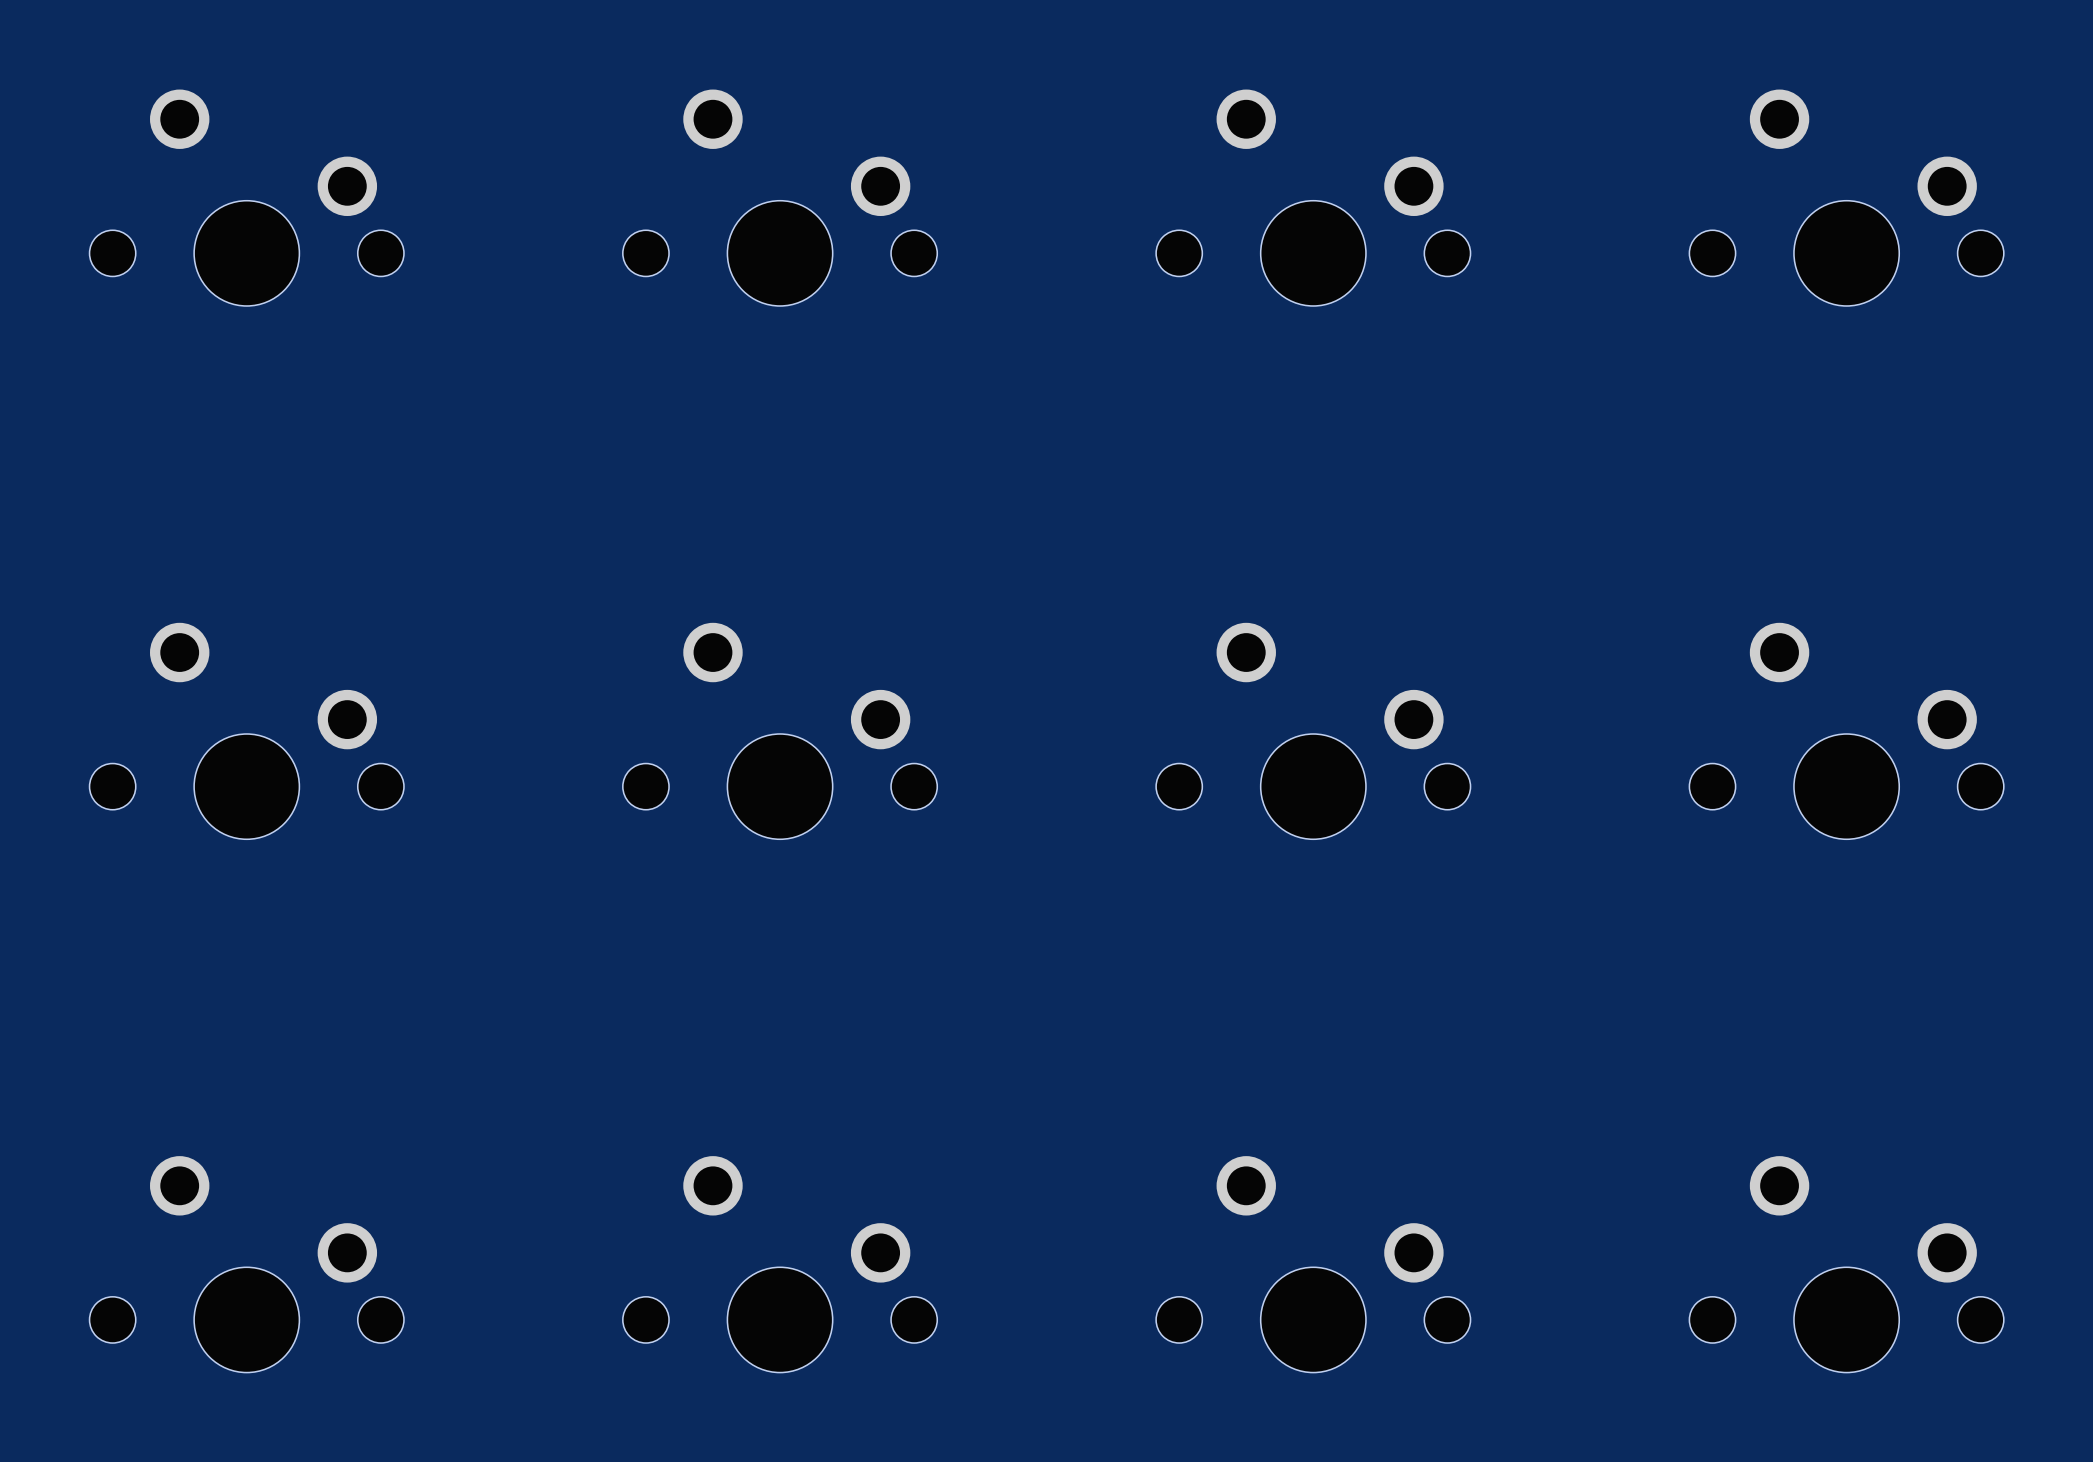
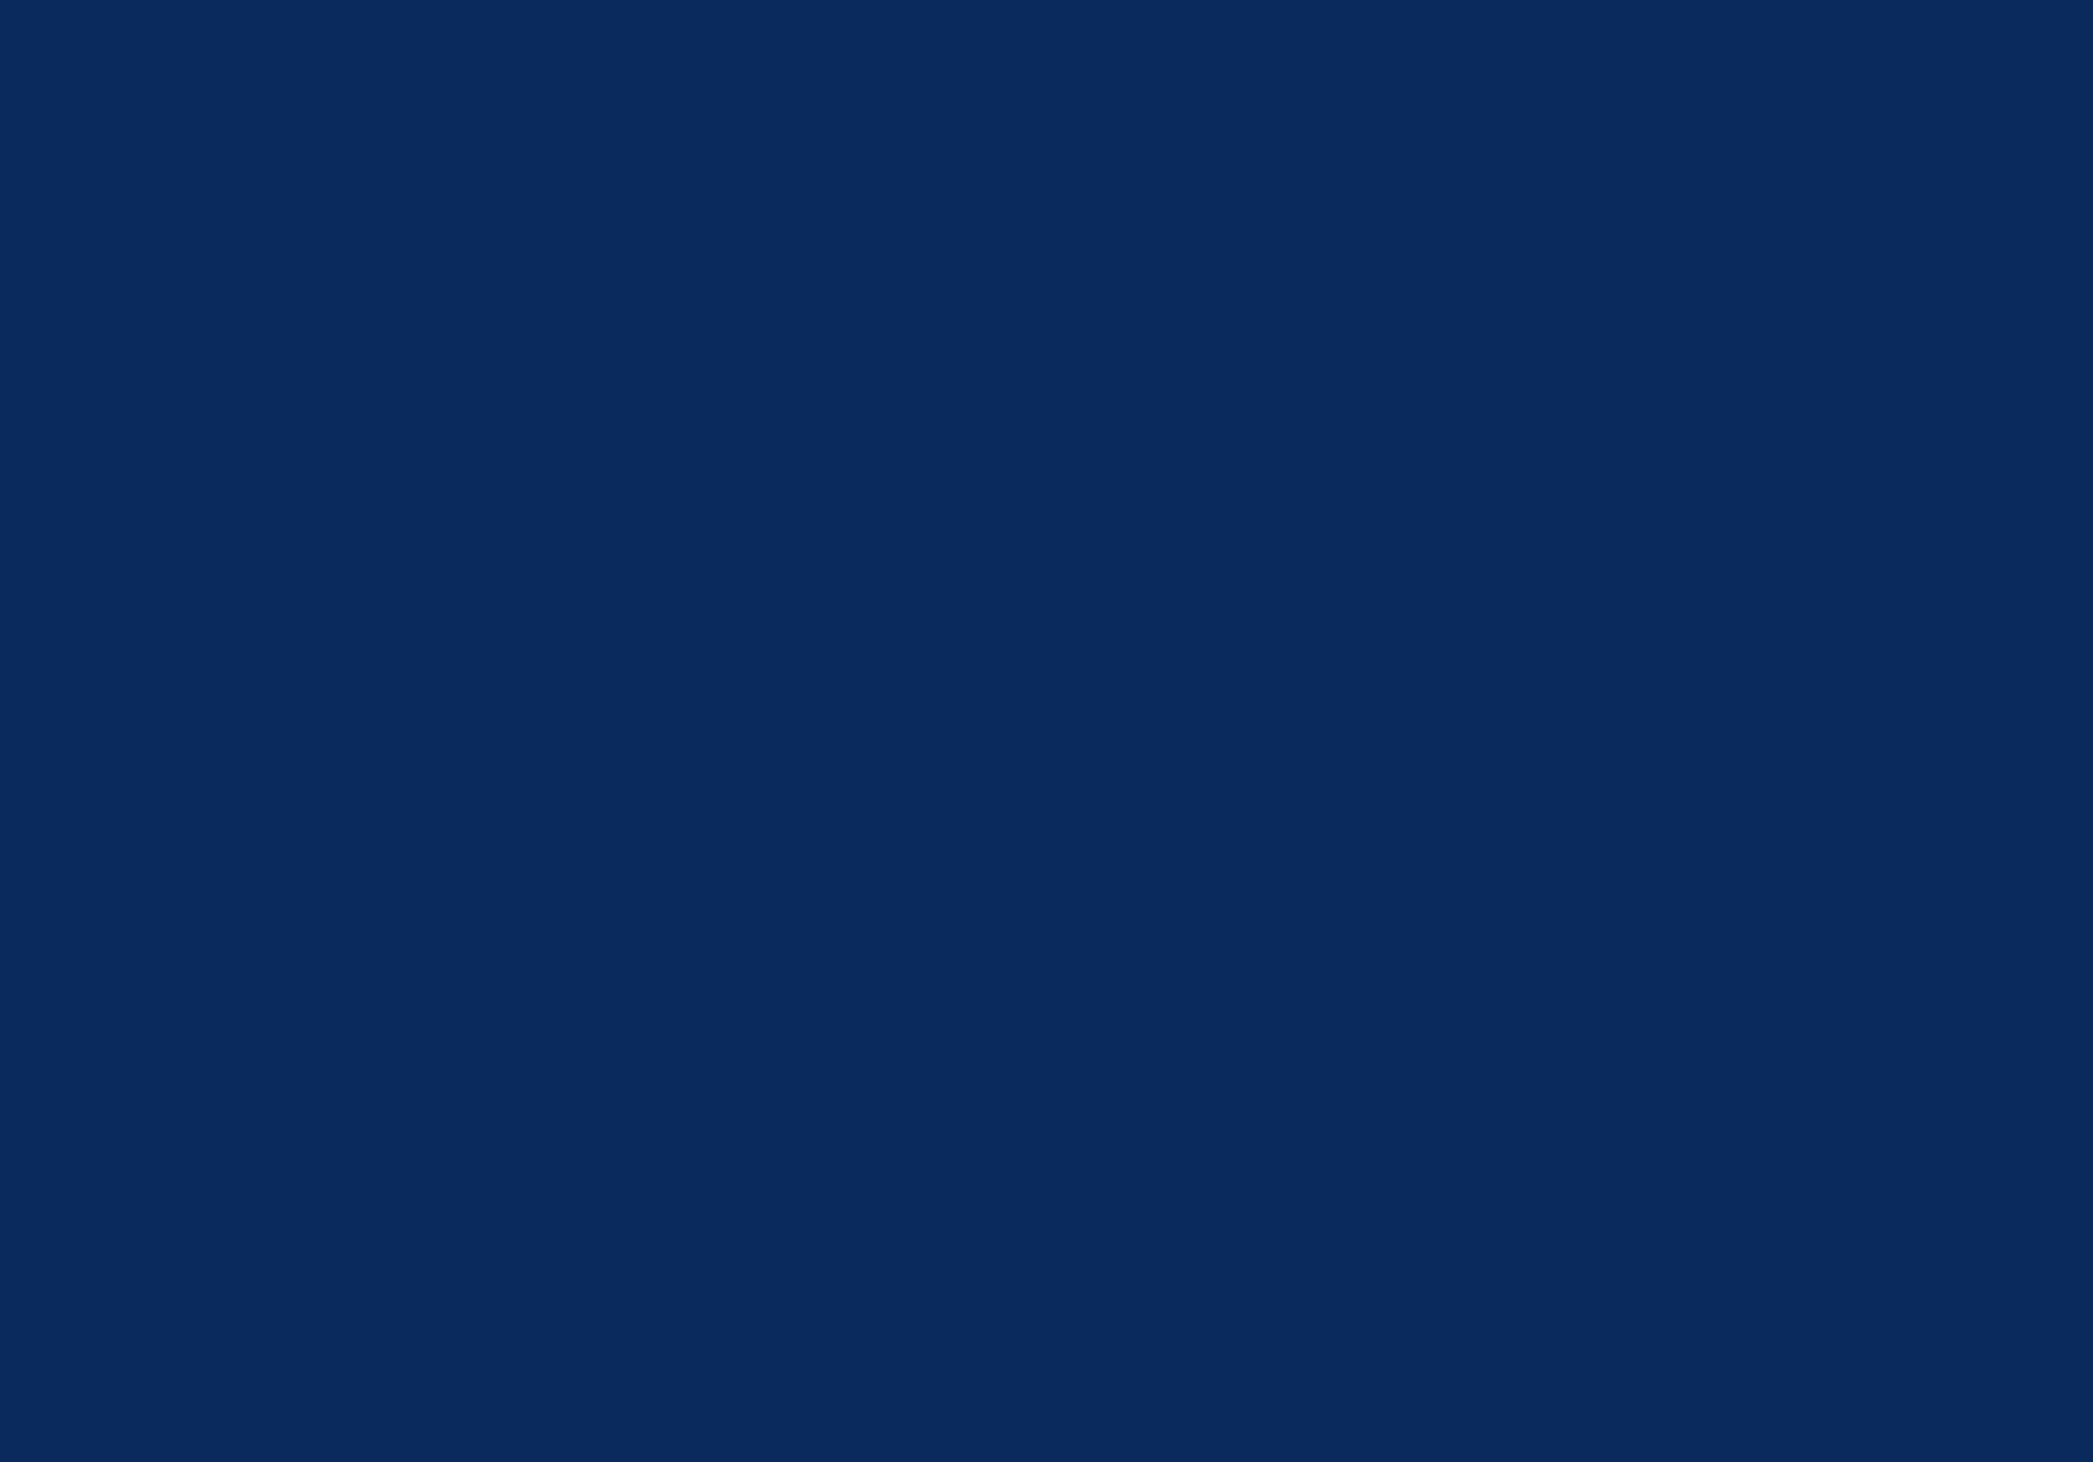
part: (246, 197) -> none
part: (780, 197) -> none
part: (1313, 197) -> none
part: (1846, 197) -> none
part: (246, 731) -> none
part: (780, 731) -> none
part: (1313, 731) -> none
part: (1846, 731) -> none
part: (246, 1264) -> none
part: (780, 1264) -> none
part: (1313, 1264) -> none
part: (1846, 1264) -> none

